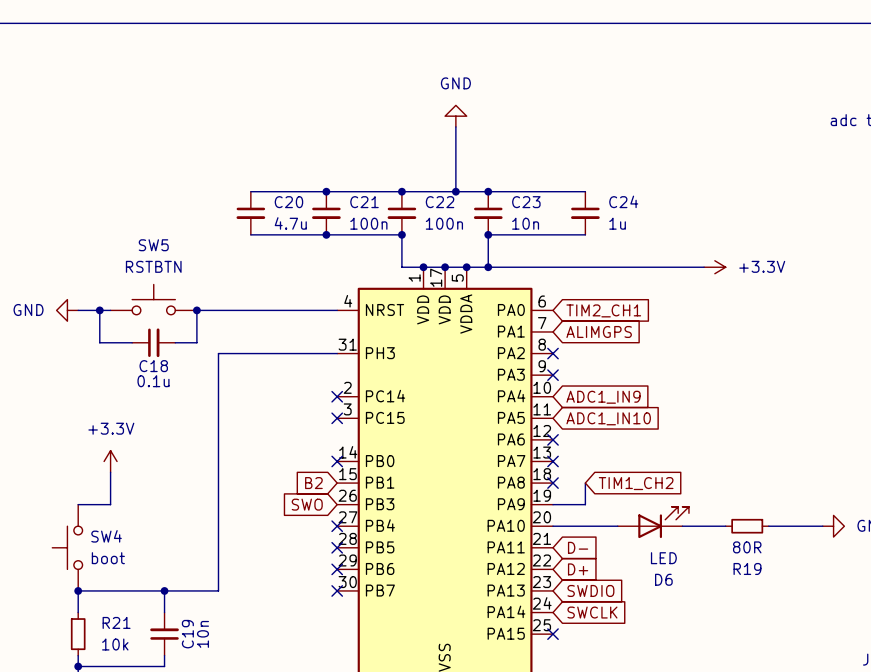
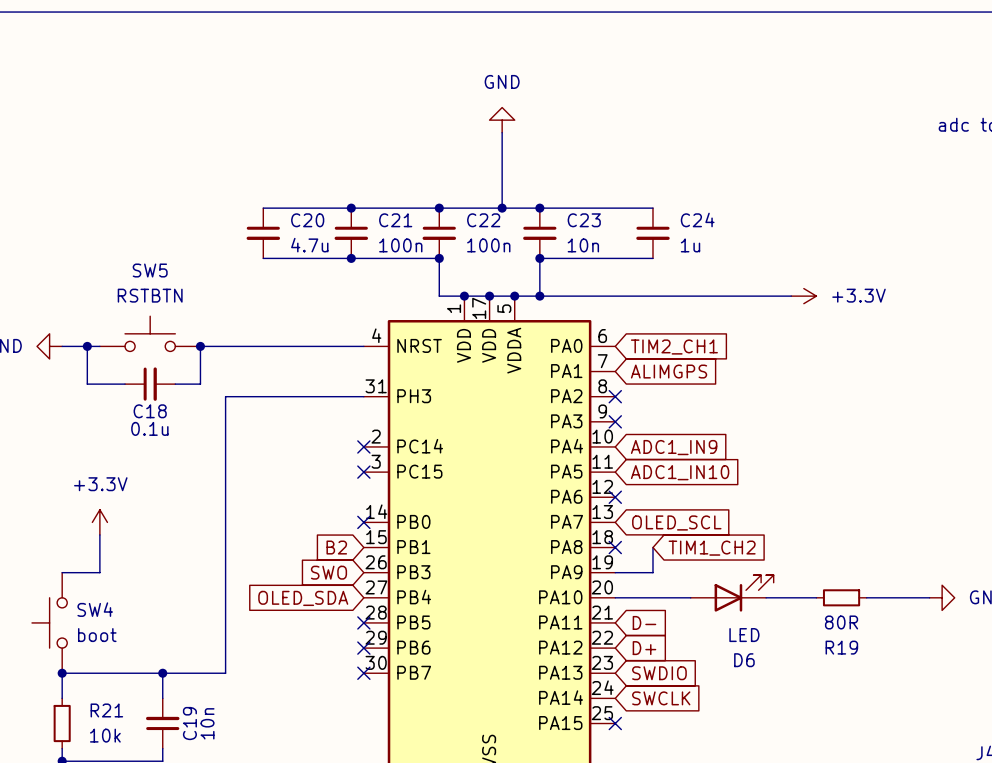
no-connect mark: (553, 461) -> none
global label: none -> OLED_SCL (676, 522)
global label: none -> OLED_SDA (303, 598)
no-connect mark: (337, 526) -> none

